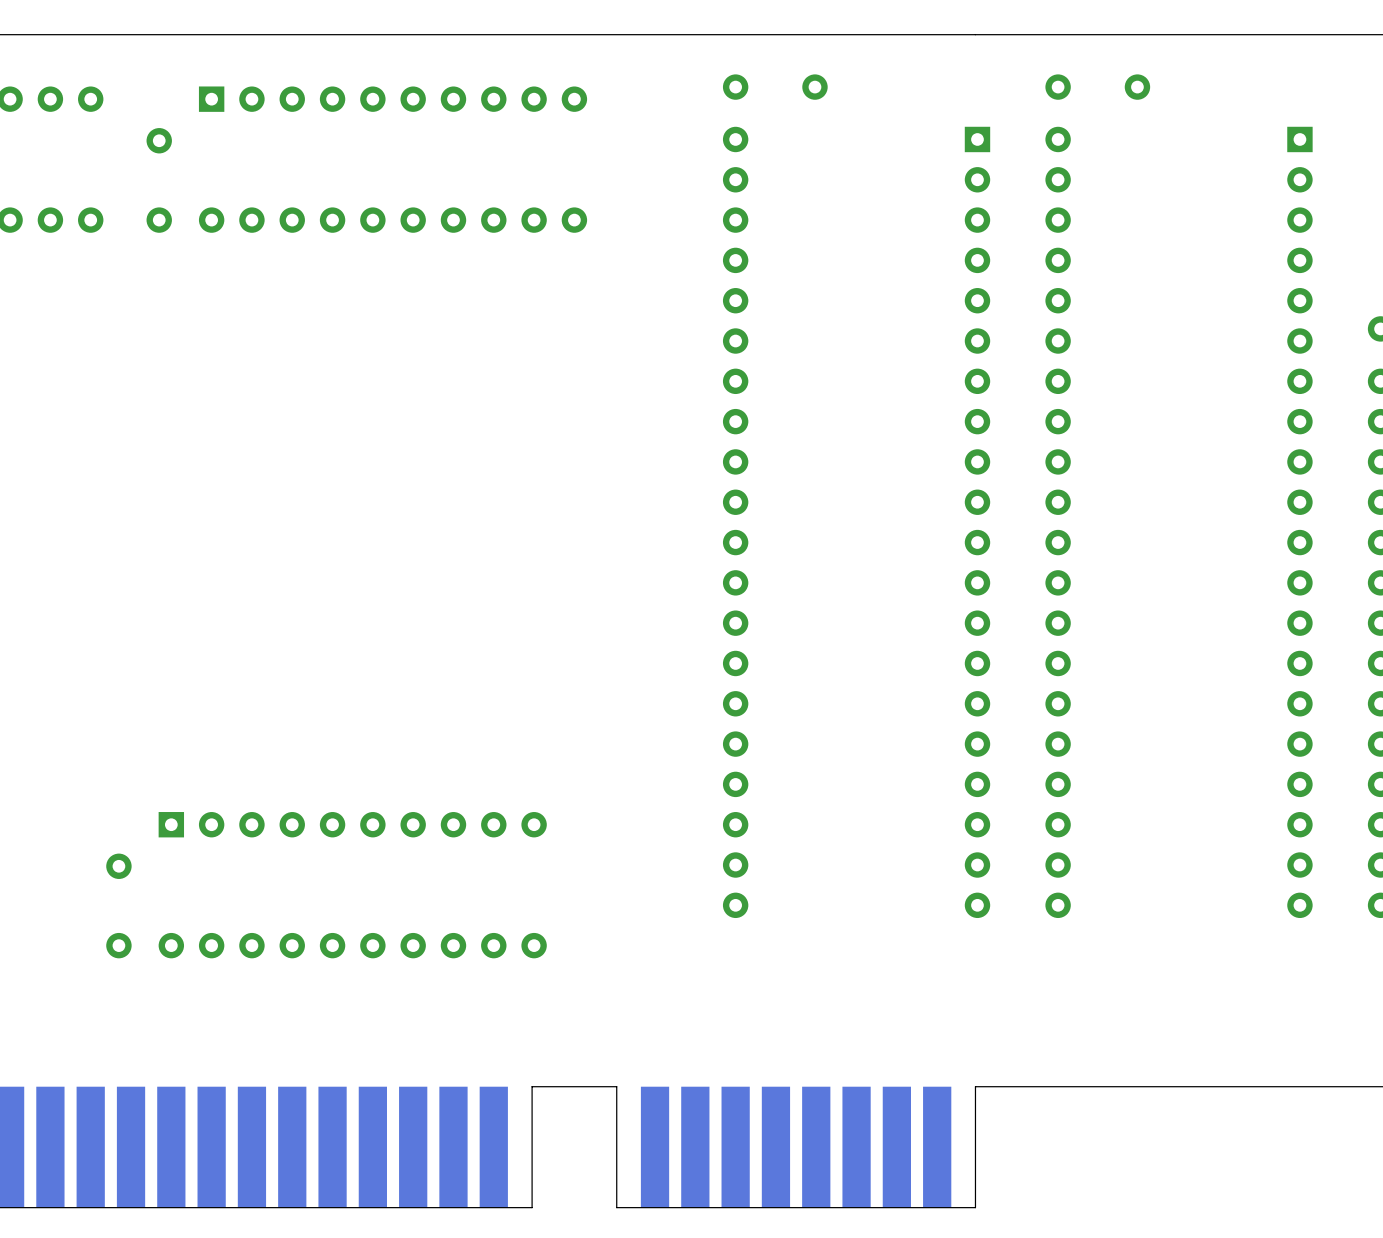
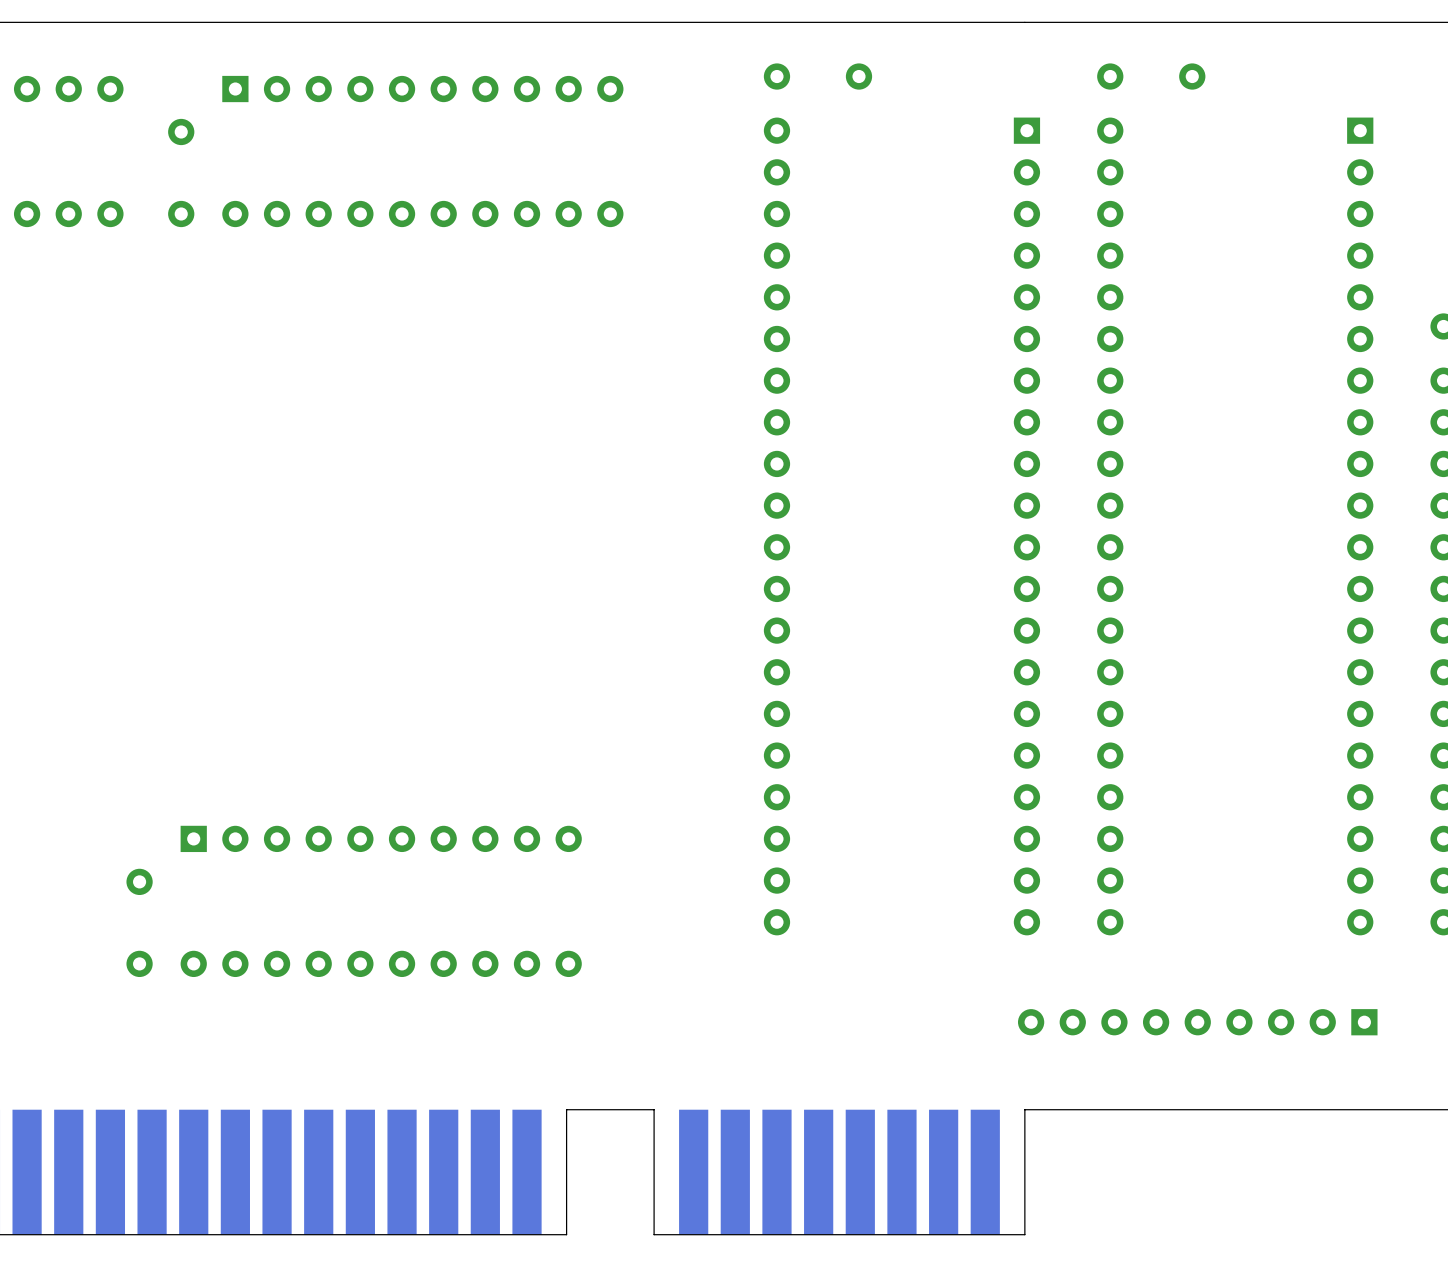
part: none -> (1197, 1022)

